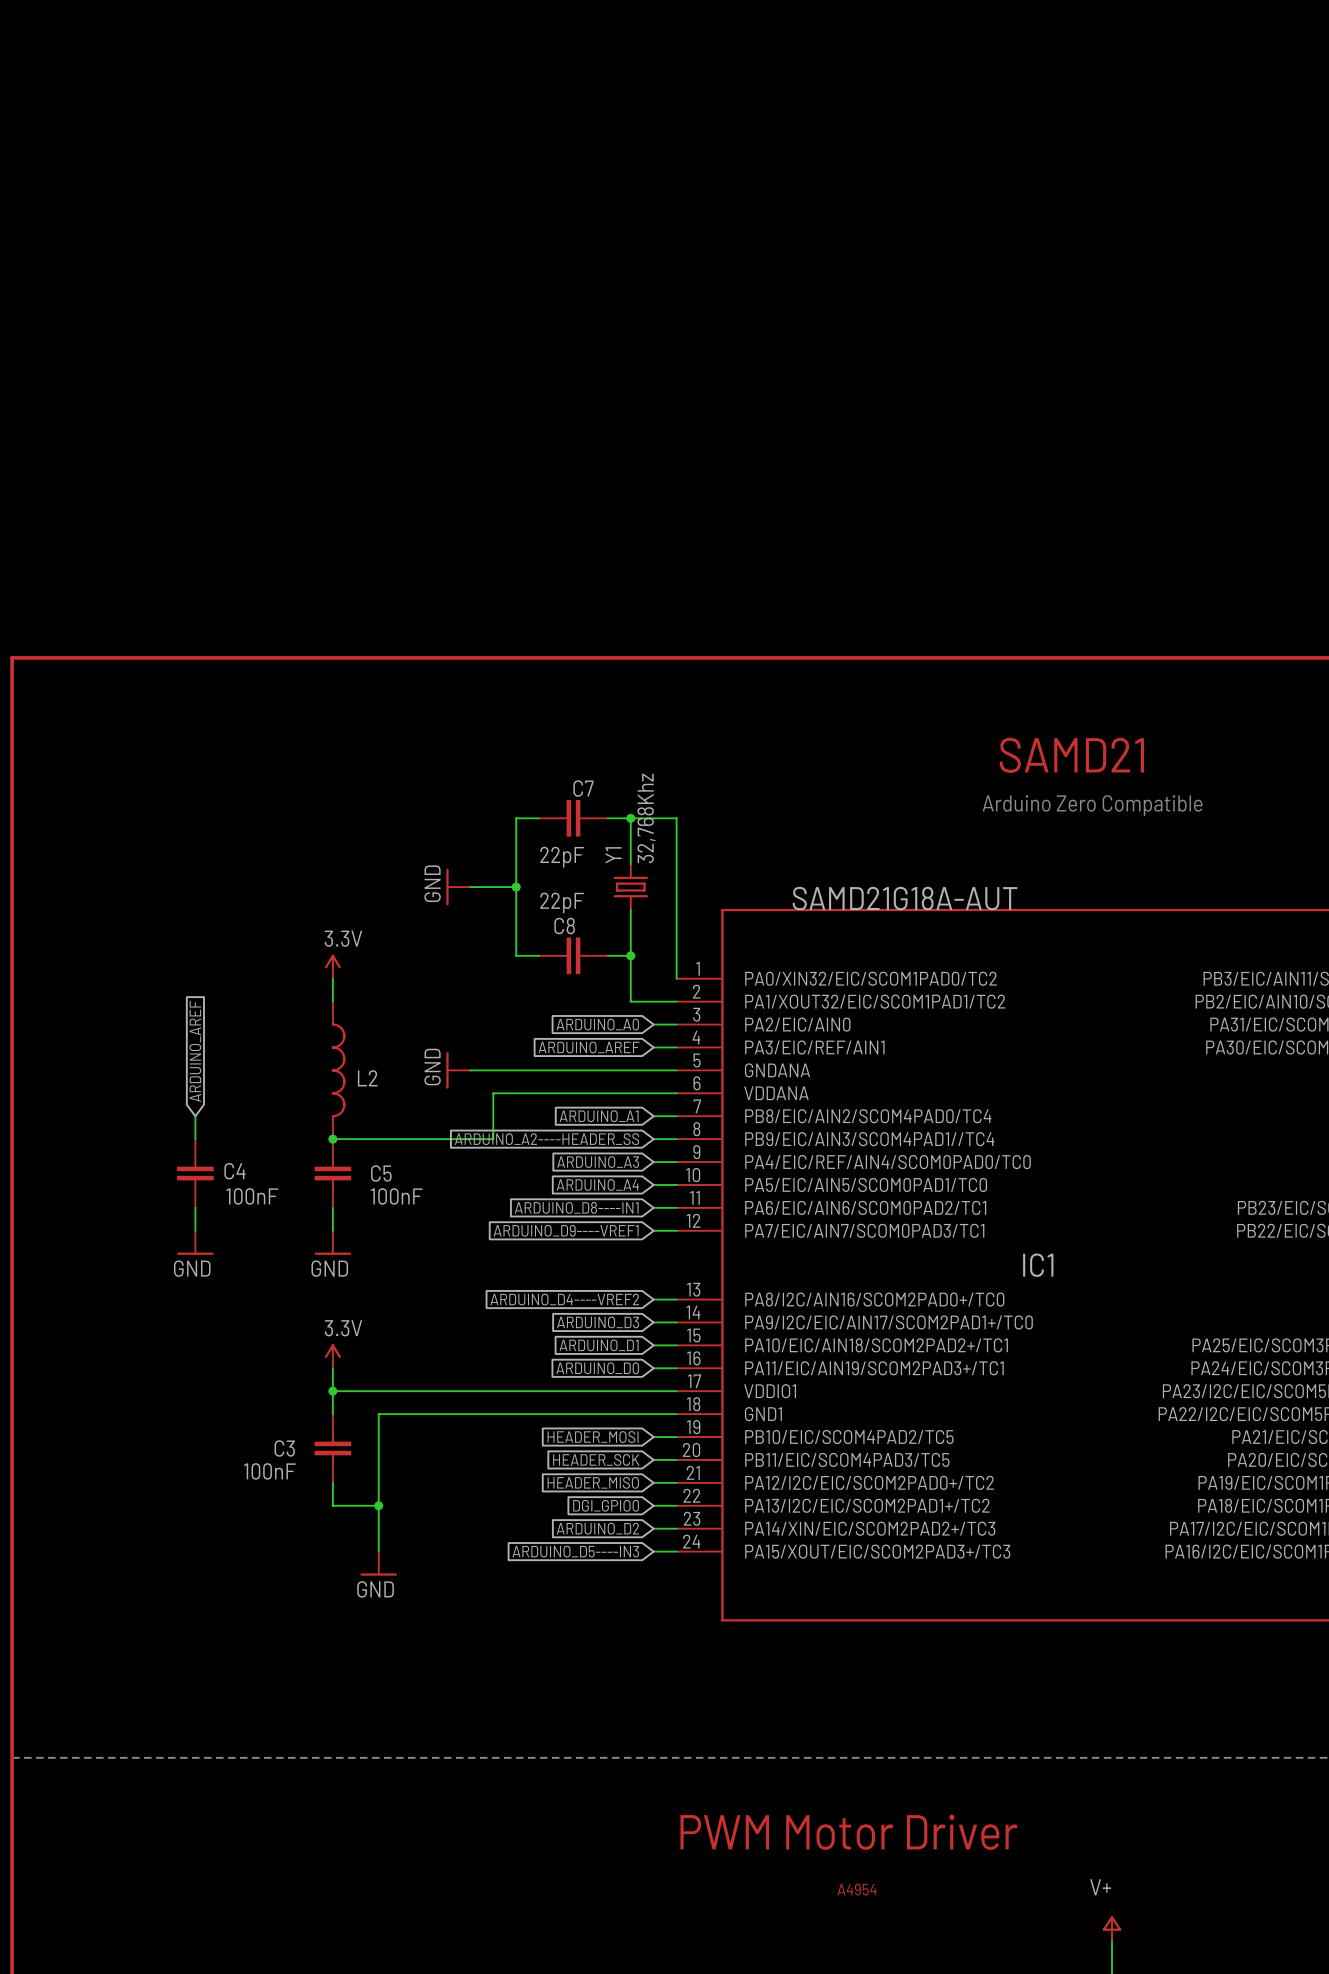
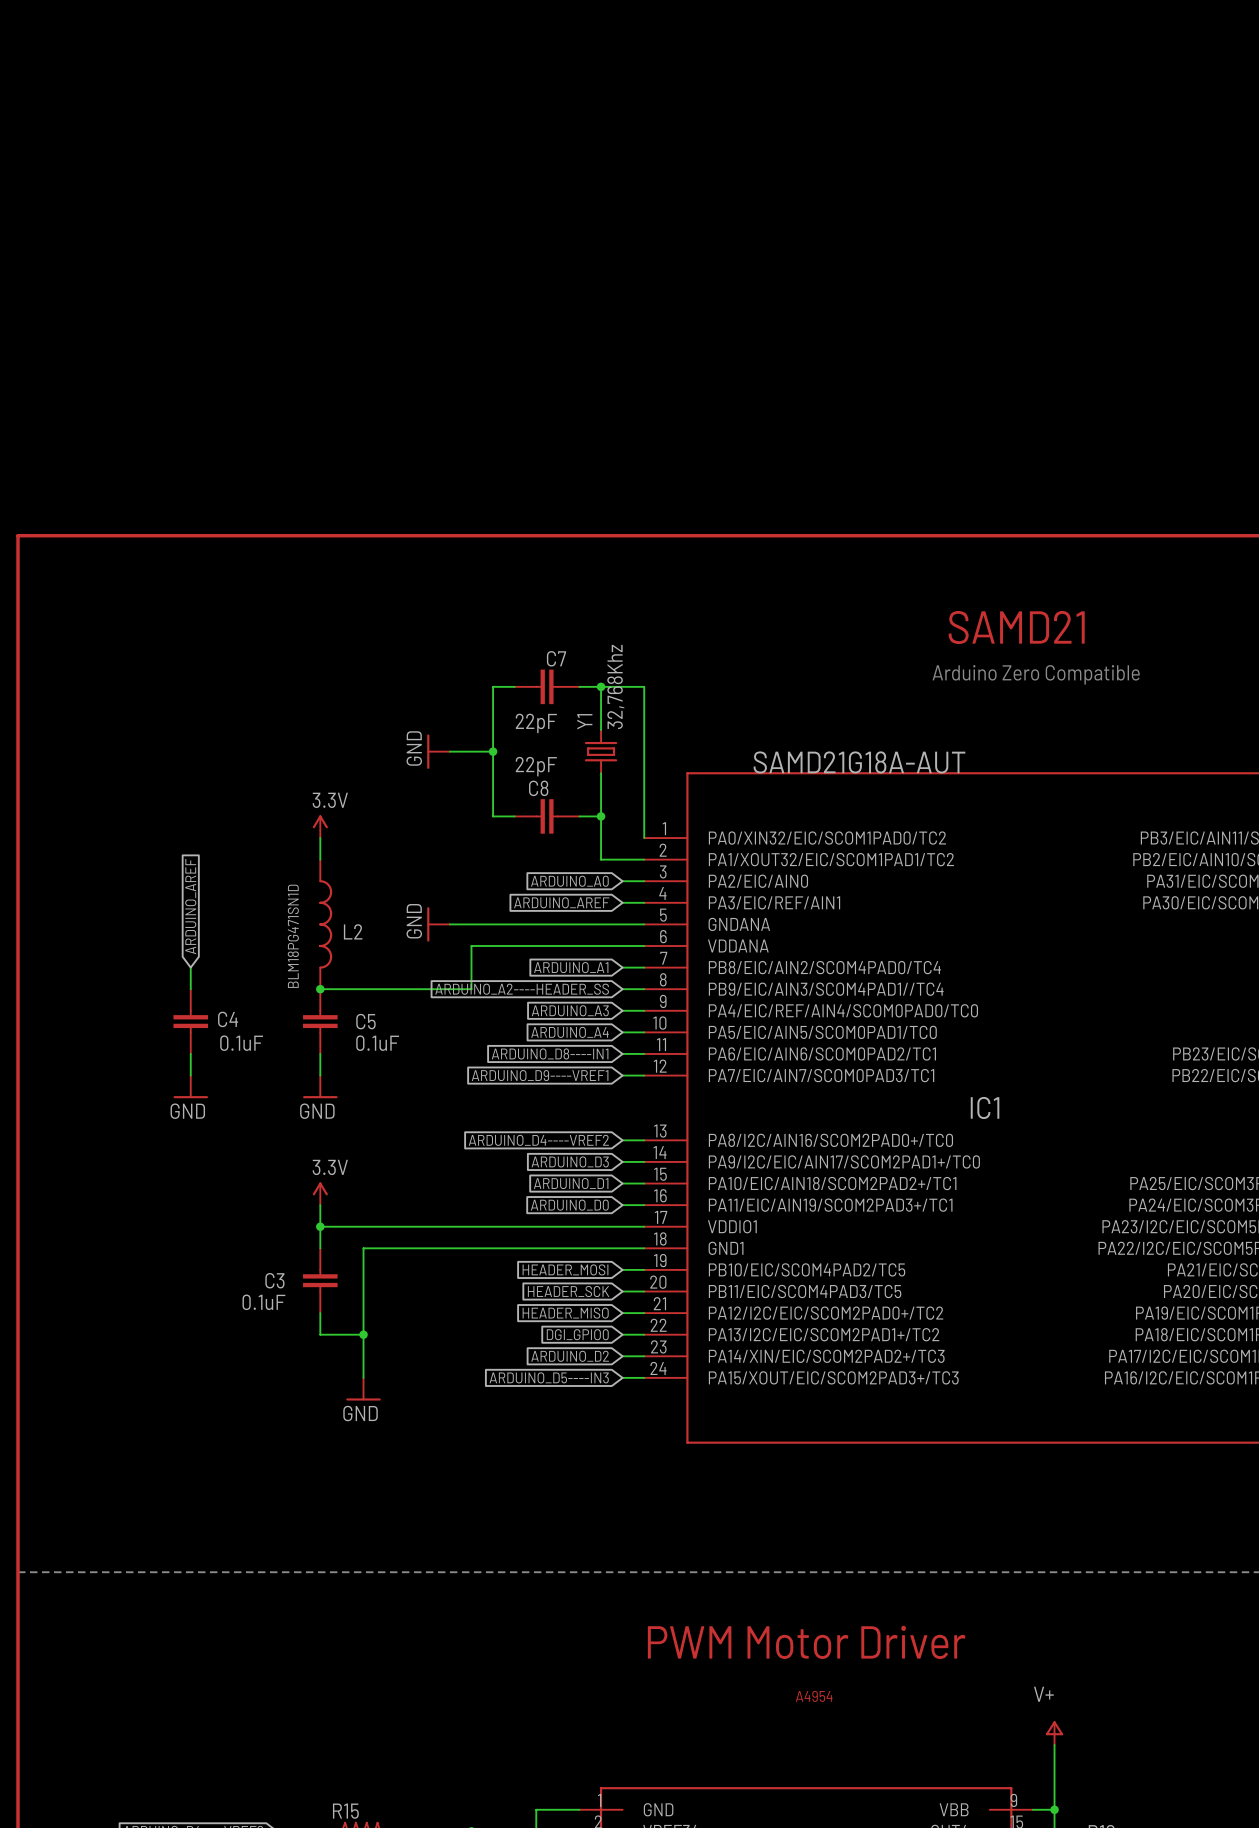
L2 value: none -> BLM18PG471SN1D (293, 936)
C4 value: 100nF (252, 1196) -> 0.1uF (241, 1043)
C5 value: 100nF (396, 1196) -> 0.1uF (377, 1043)
C3 value: 100nF (269, 1471) -> 0.1uF (263, 1302)

